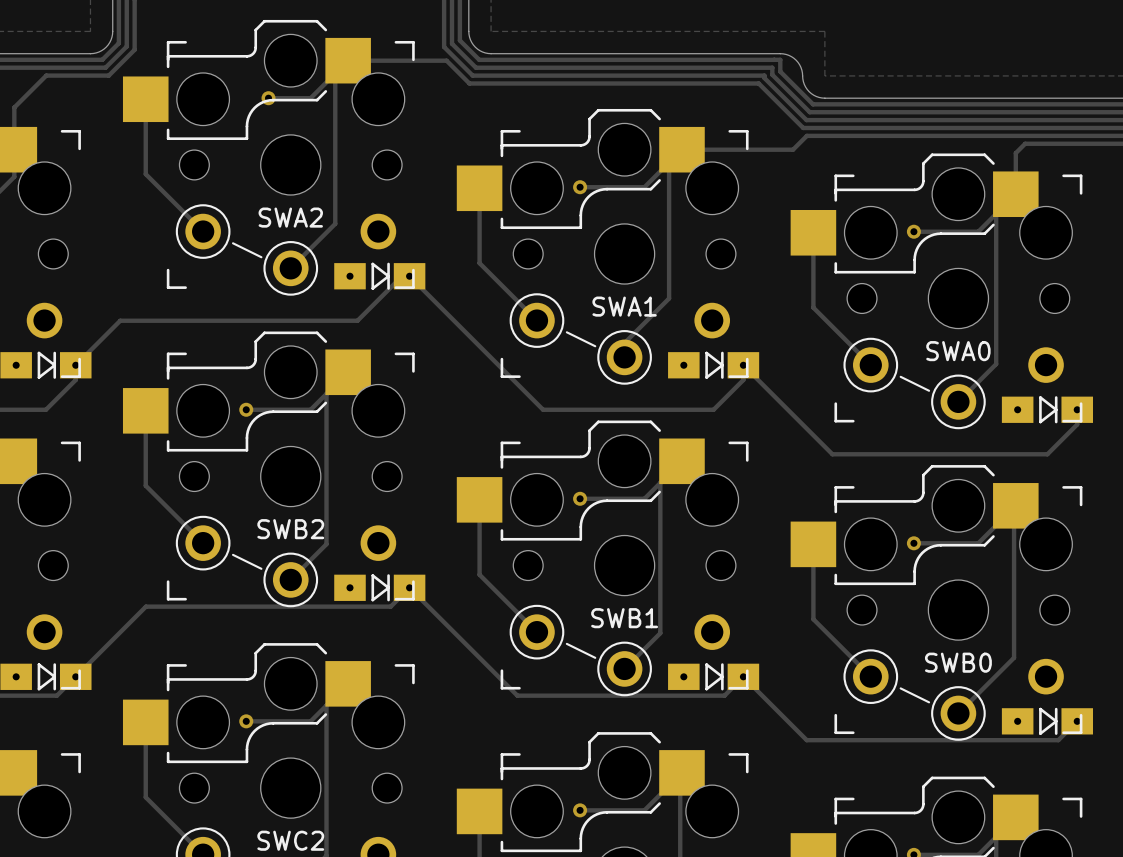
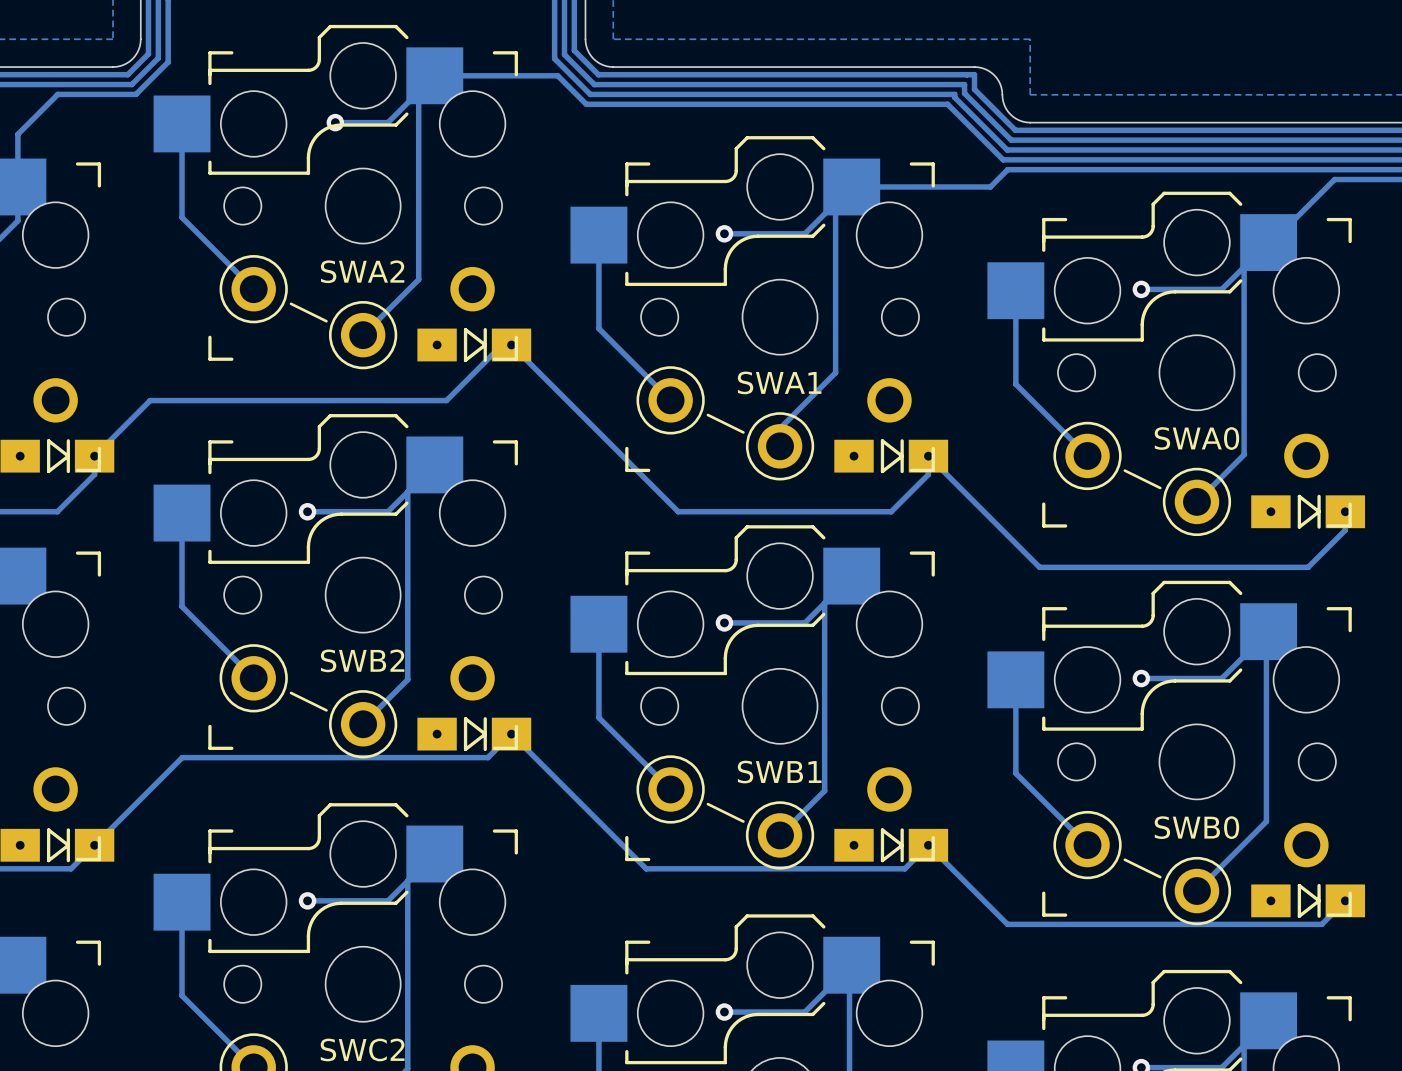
track: (1068, 143) (1025, 143) (1015, 153) (1015, 194) -> (1334, 179) (1271, 242)

